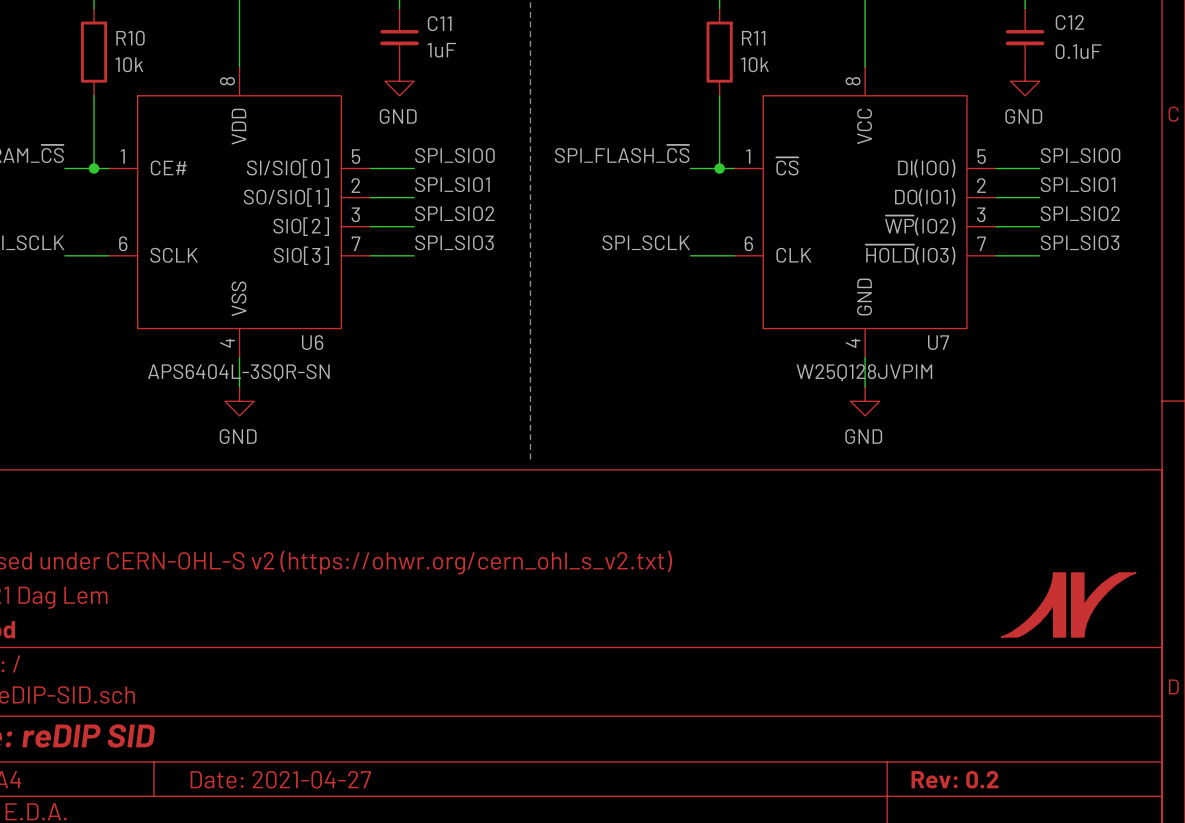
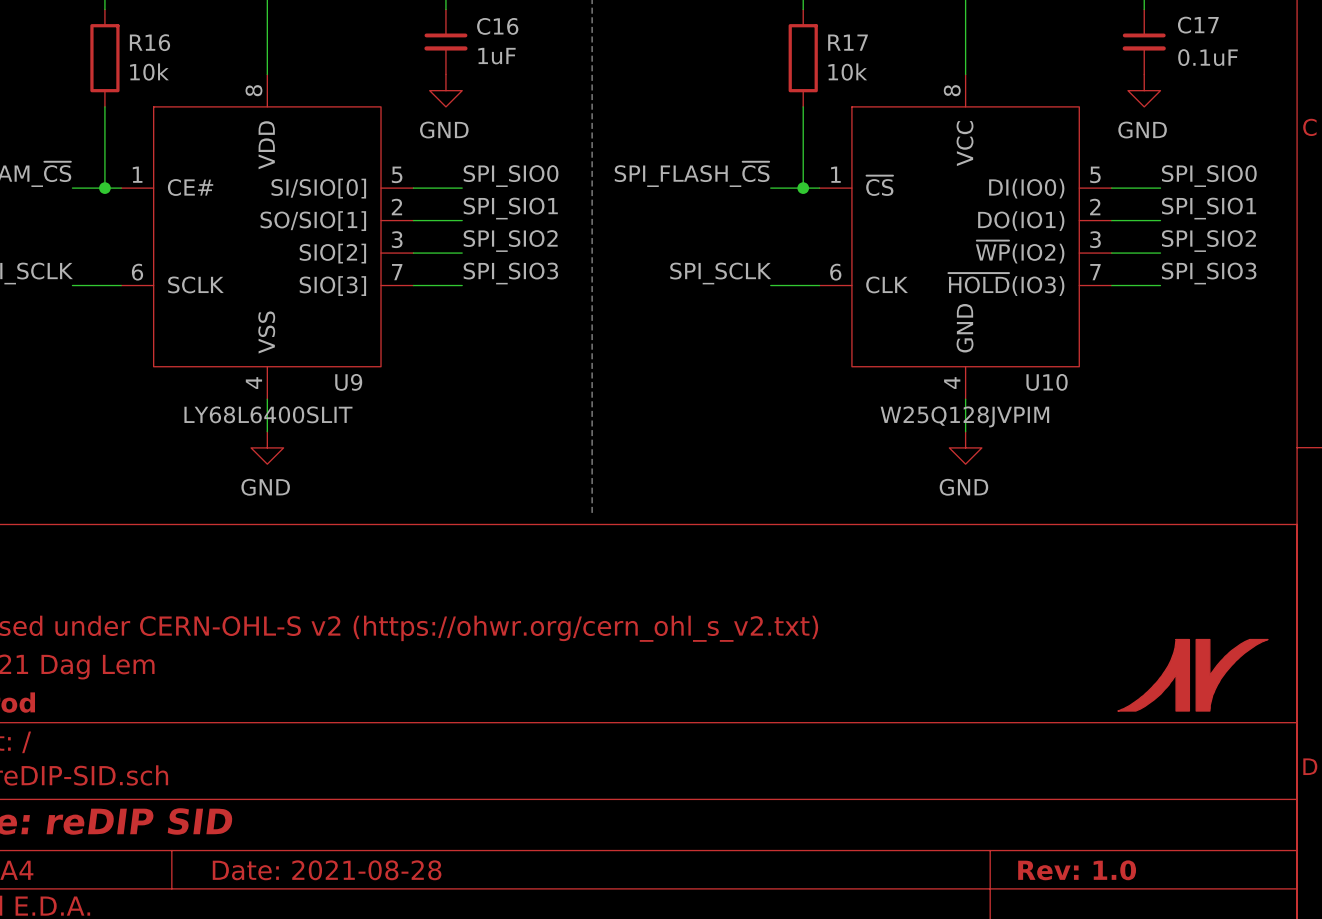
C12 name: C12 (1069, 22) -> C17 (1198, 25)
C11 name: C11 (439, 23) -> C16 (497, 26)
R10 name: R10 (130, 38) -> R16 (149, 42)
R11 name: R11 (753, 38) -> R17 (848, 42)
U6 name: U6 (312, 342) -> U9 (348, 382)
U7 name: U7 (938, 342) -> U10 (1047, 382)
U6 value: APS6404L-3SQR-SN (238, 372) -> LY68L6400SLIT (268, 414)
title block: Date: 2021-04-27 (280, 779) -> Date: 2021-08-28 (327, 870)
title block: Rev: 0.2 (955, 779) -> Rev: 1.0 (1077, 870)

